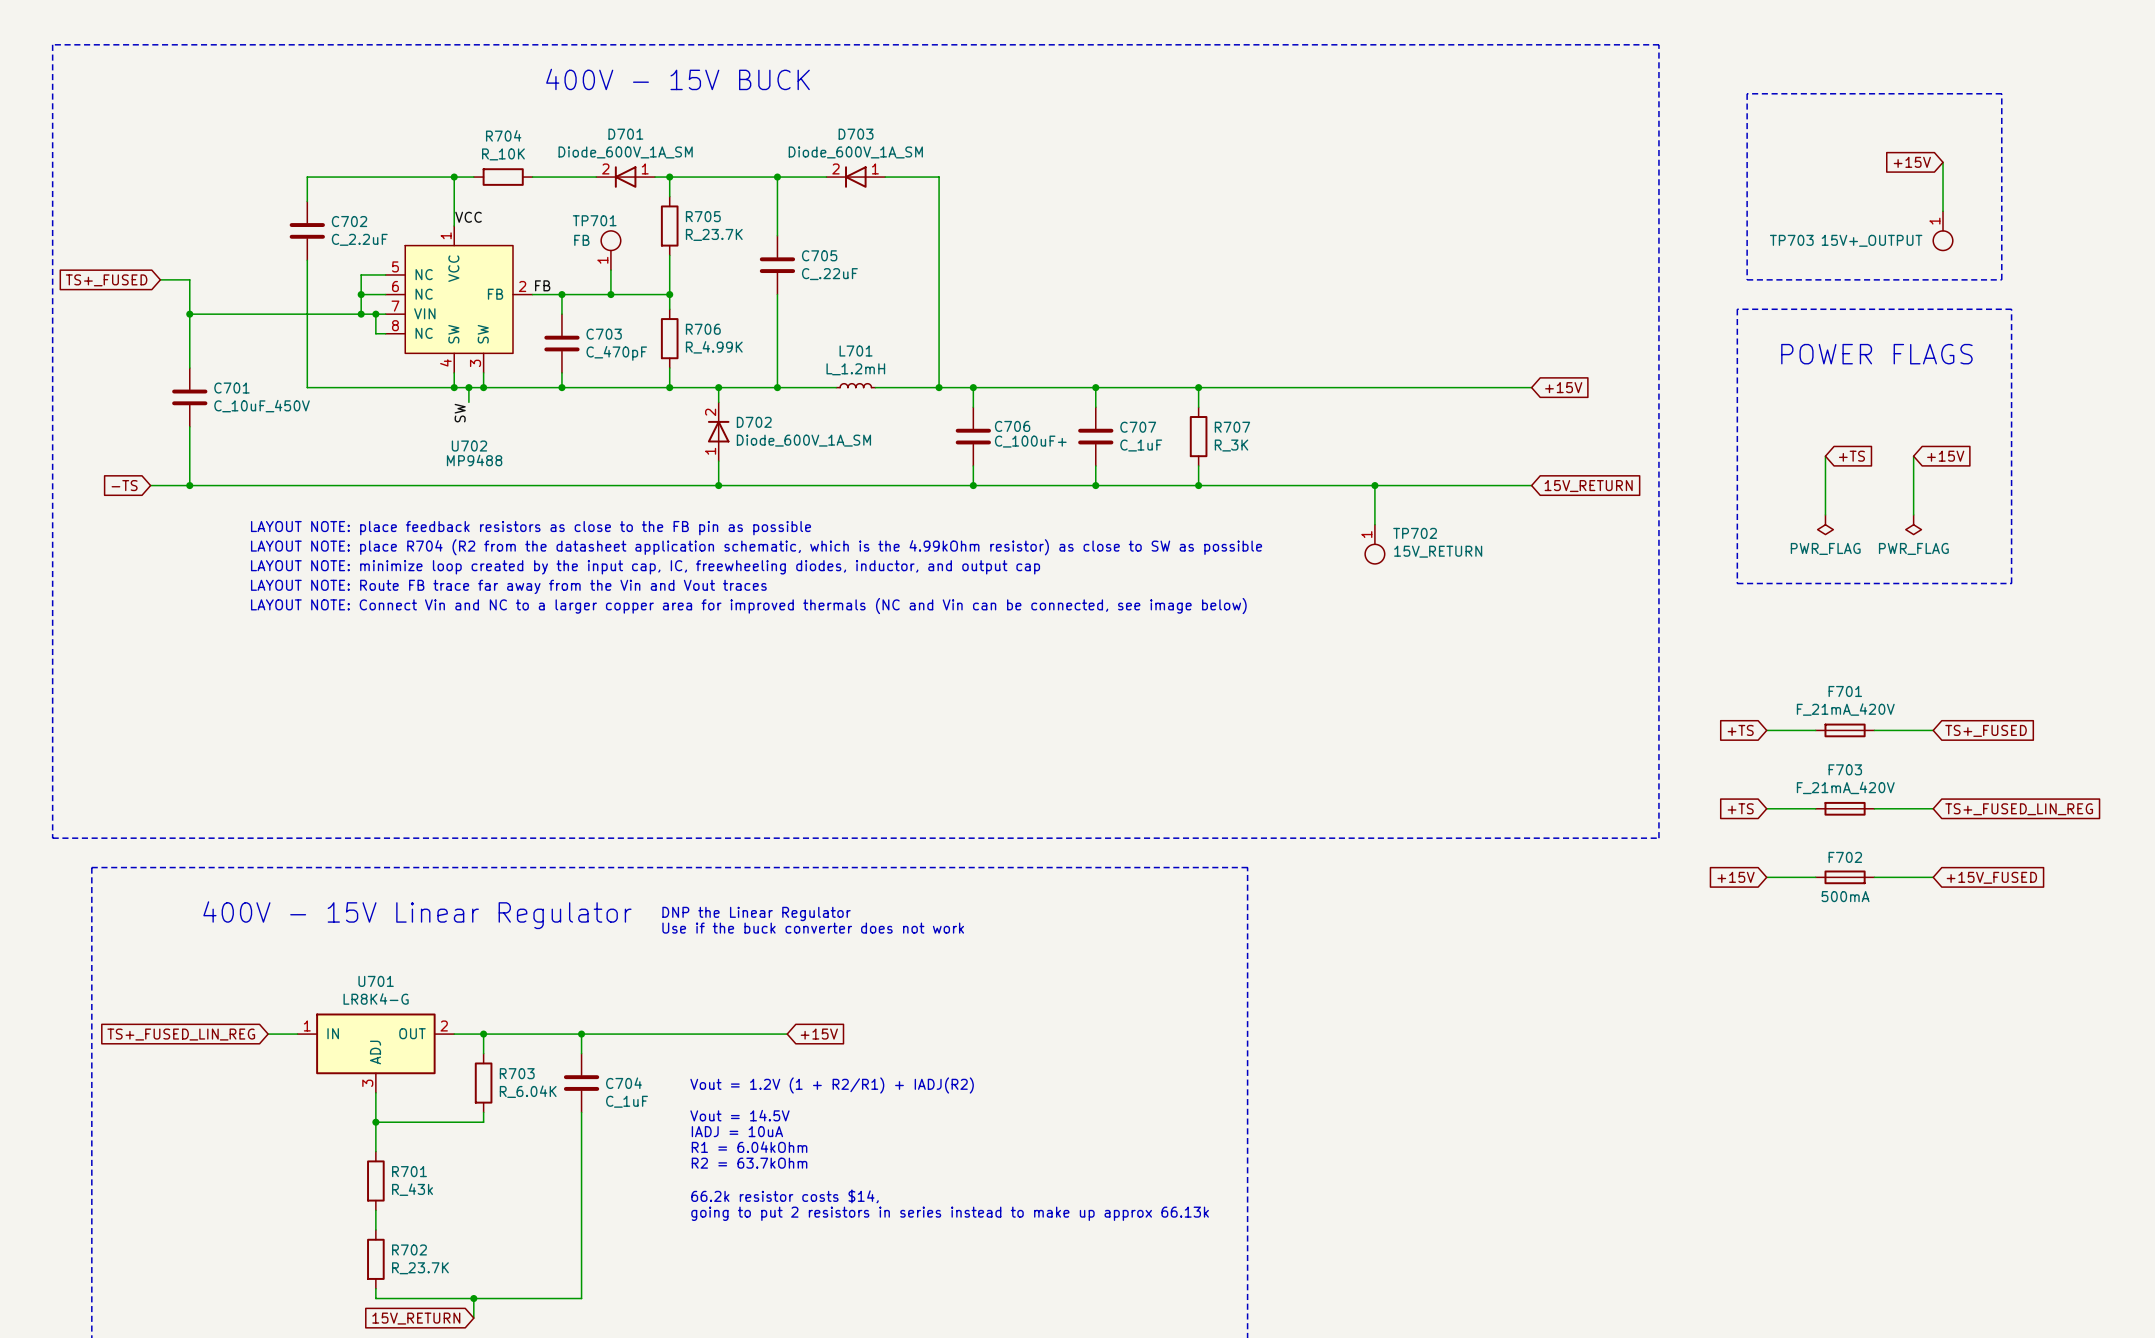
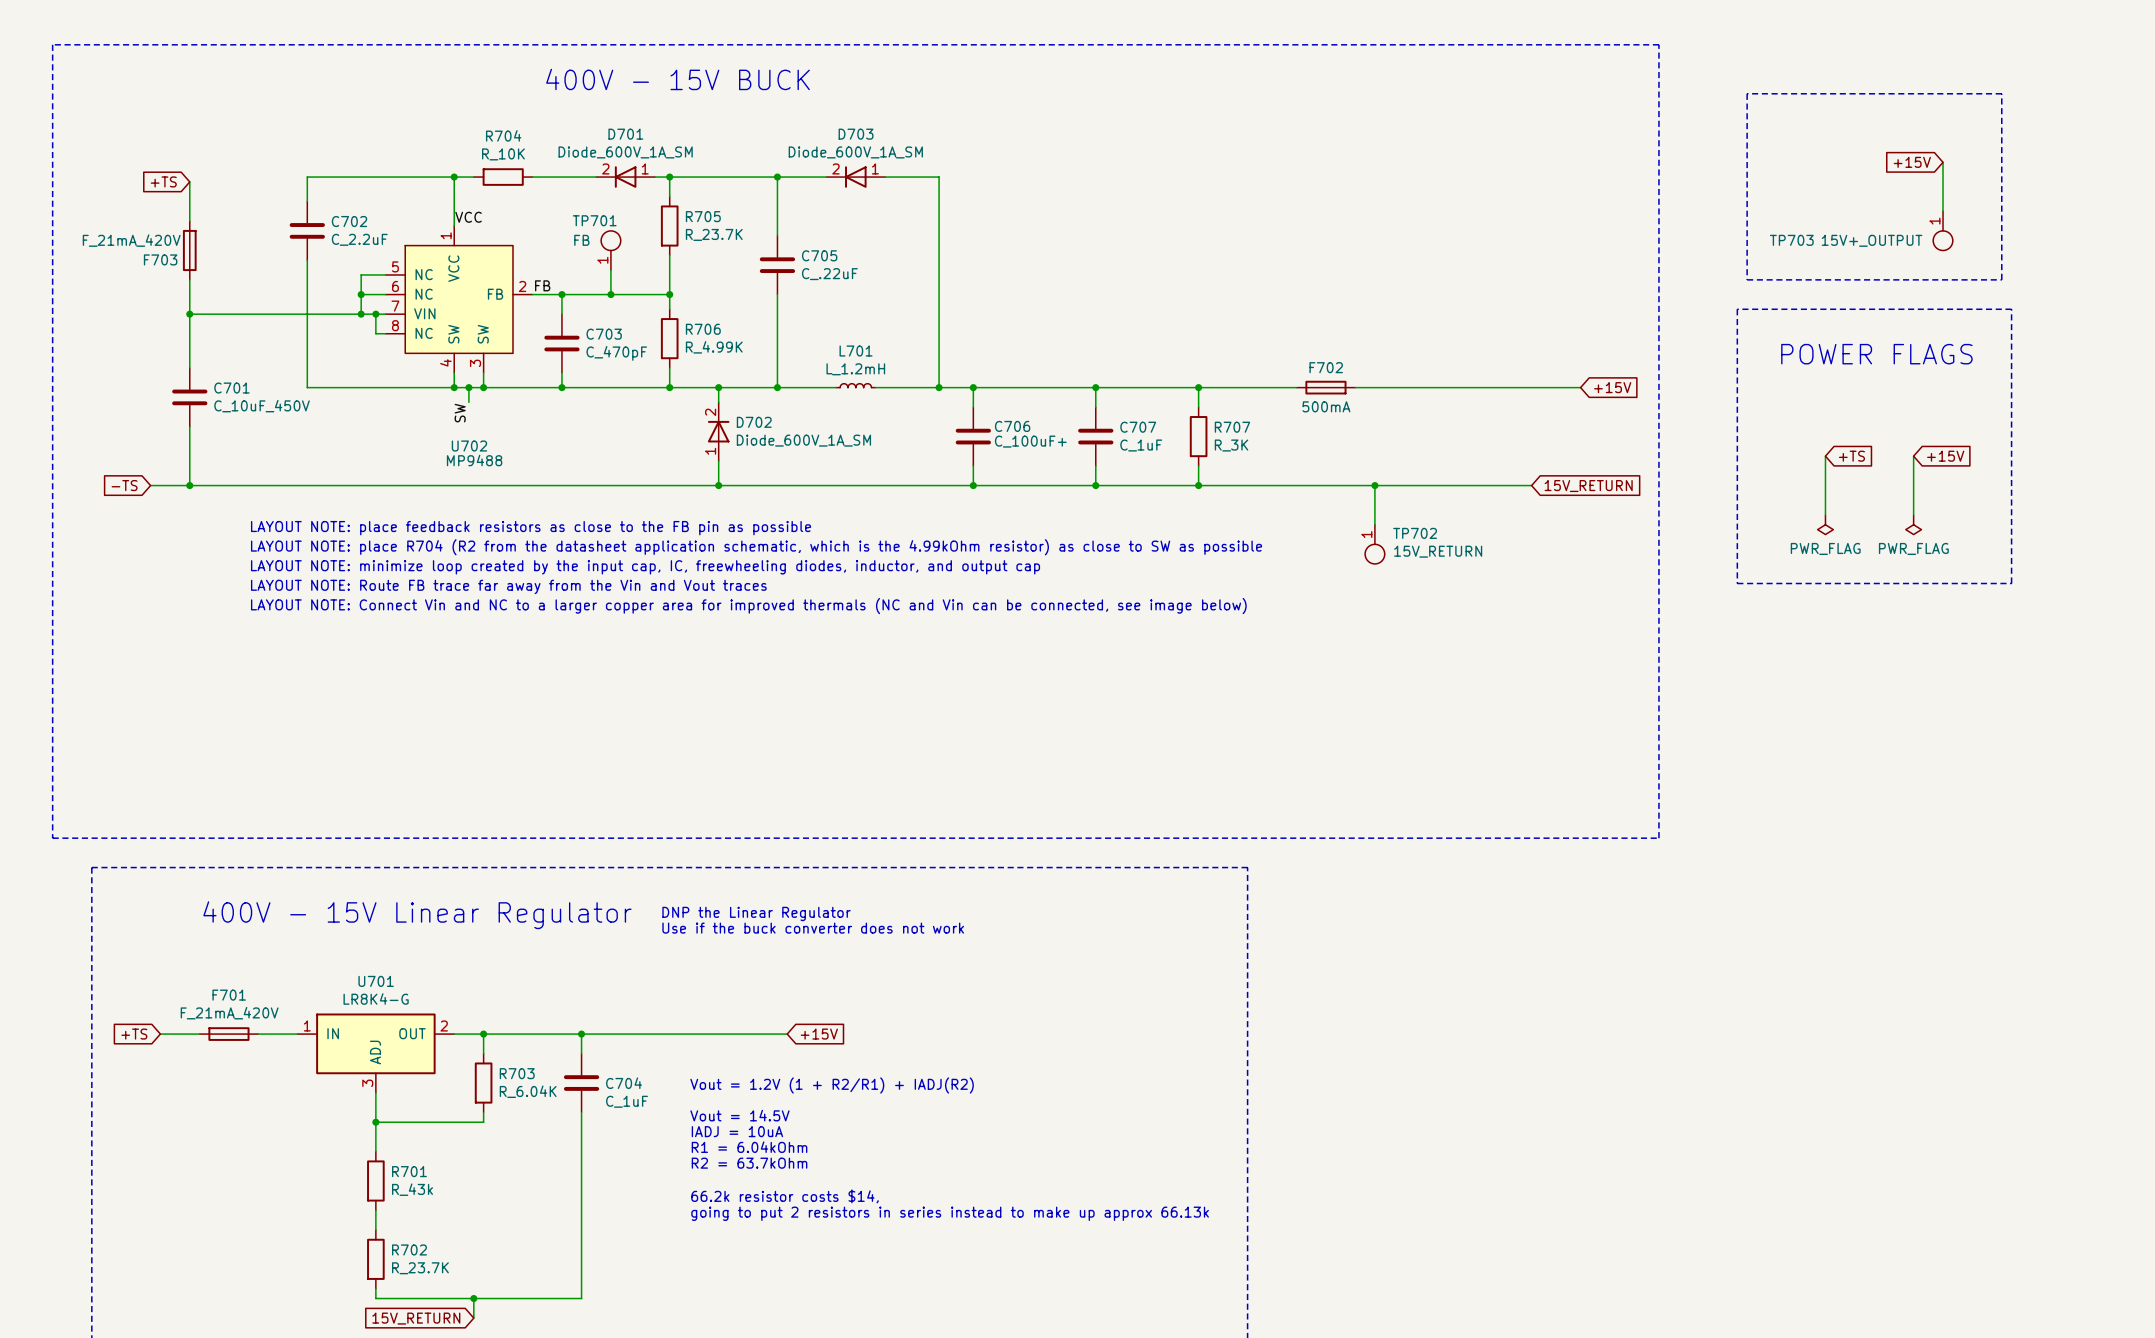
global label: none -> +TS (163, 181)
wire: none -> (189, 181) (189, 221)
wire: (160, 279) (189, 279) -> none
global label: TS+_FUSED (106, 280) -> none
wire: none -> (1531, 387) (1580, 387)
global label position: +15V (1563, 387) -> +15V (1612, 387)
global label: +TS (1740, 730) -> none
wire: (1766, 730) (1815, 730) -> none
F701 position: (1845, 730) -> (228, 1034)
wire: (1874, 730) (1933, 730) -> none
global label: TS+_FUSED (1986, 730) -> none
F703 name position: F703 (1845, 769) -> F703 (160, 259)
F703 value position: F_21mA_420V (1845, 787) -> F_21mA_420V (131, 240)
global label: +TS (1740, 808) -> none
wire: (1766, 808) (1815, 808) -> none
F703 rotation: 0° (1845, 808) -> 90° clockwise (189, 250)
F703 position: (1845, 808) -> (189, 250)
wire: (1874, 808) (1933, 808) -> none
global label: TS+_FUSED_LIN_REG (2019, 809) -> none
global label: +15V (1736, 877) -> none
wire: (1766, 877) (1815, 877) -> none
F702 position: (1845, 877) -> (1325, 387)
wire: (1874, 877) (1933, 877) -> none
global label: +15V_FUSED (1991, 877) -> none
global label: none -> +TS (134, 1034)
wire: none -> (160, 1034) (199, 1034)
global label: TS+_FUSED_LIN_REG (181, 1034) -> none
wire: none -> (258, 1034) (268, 1034)

